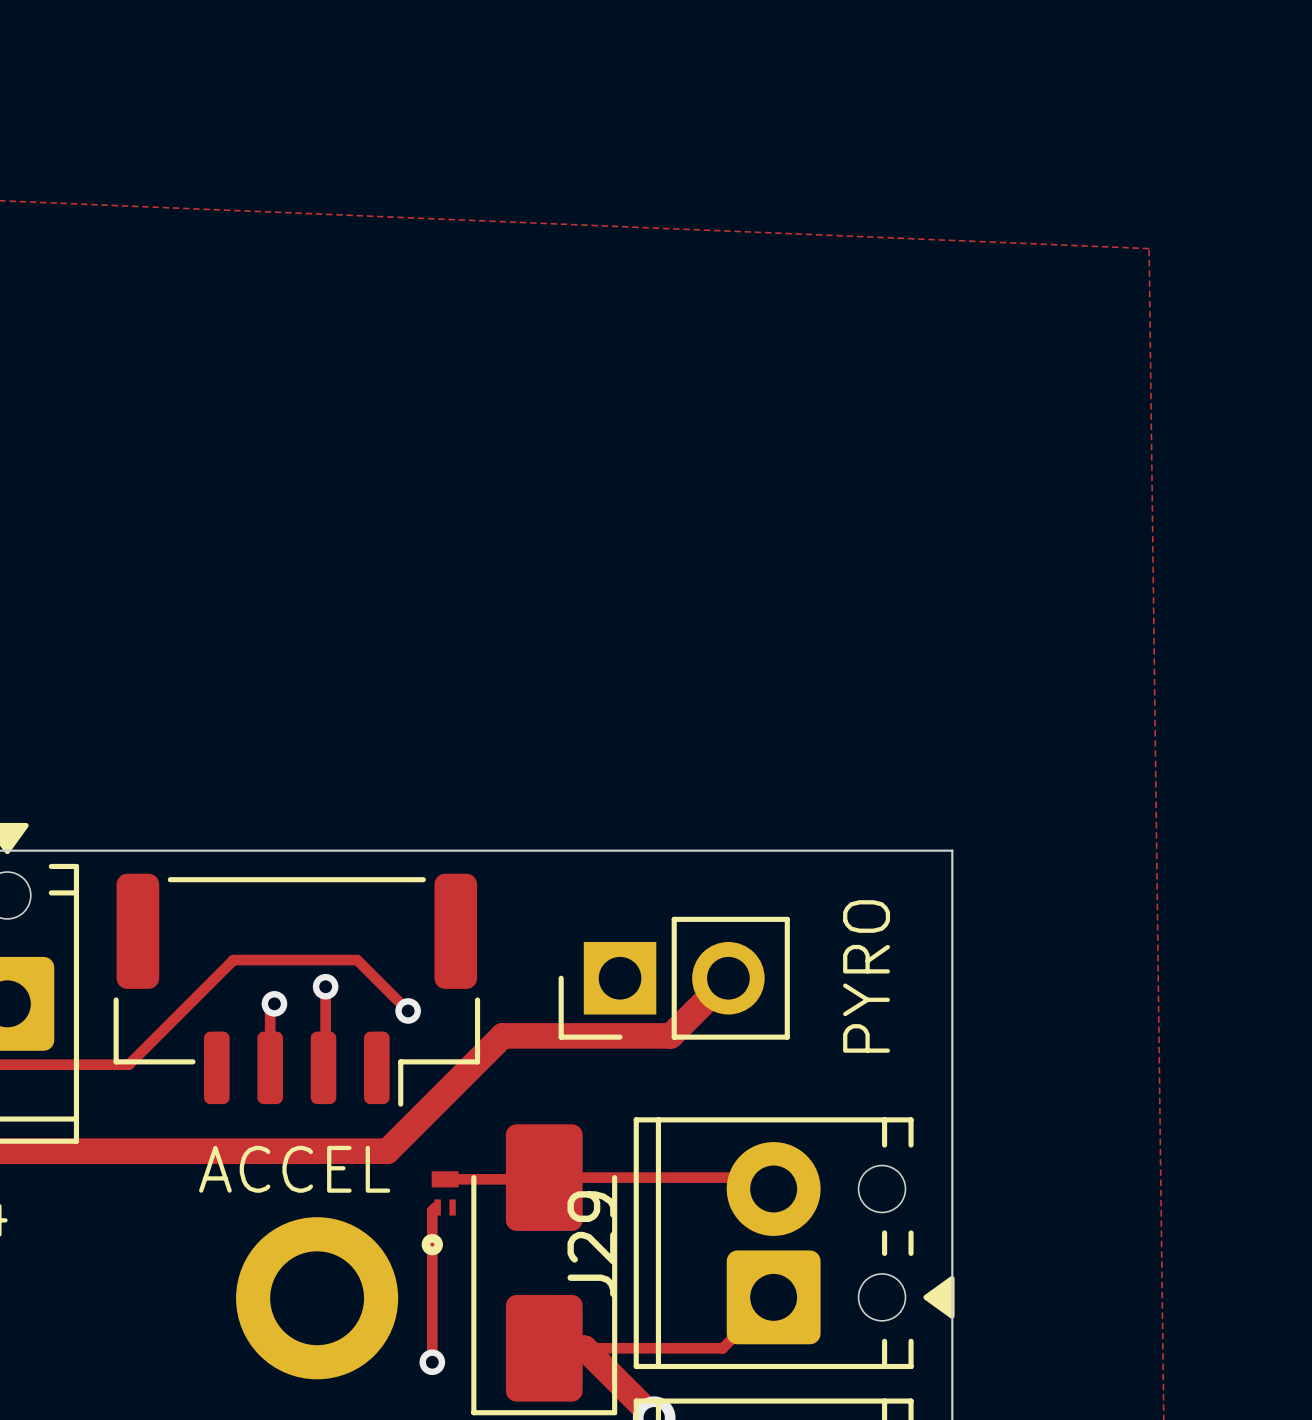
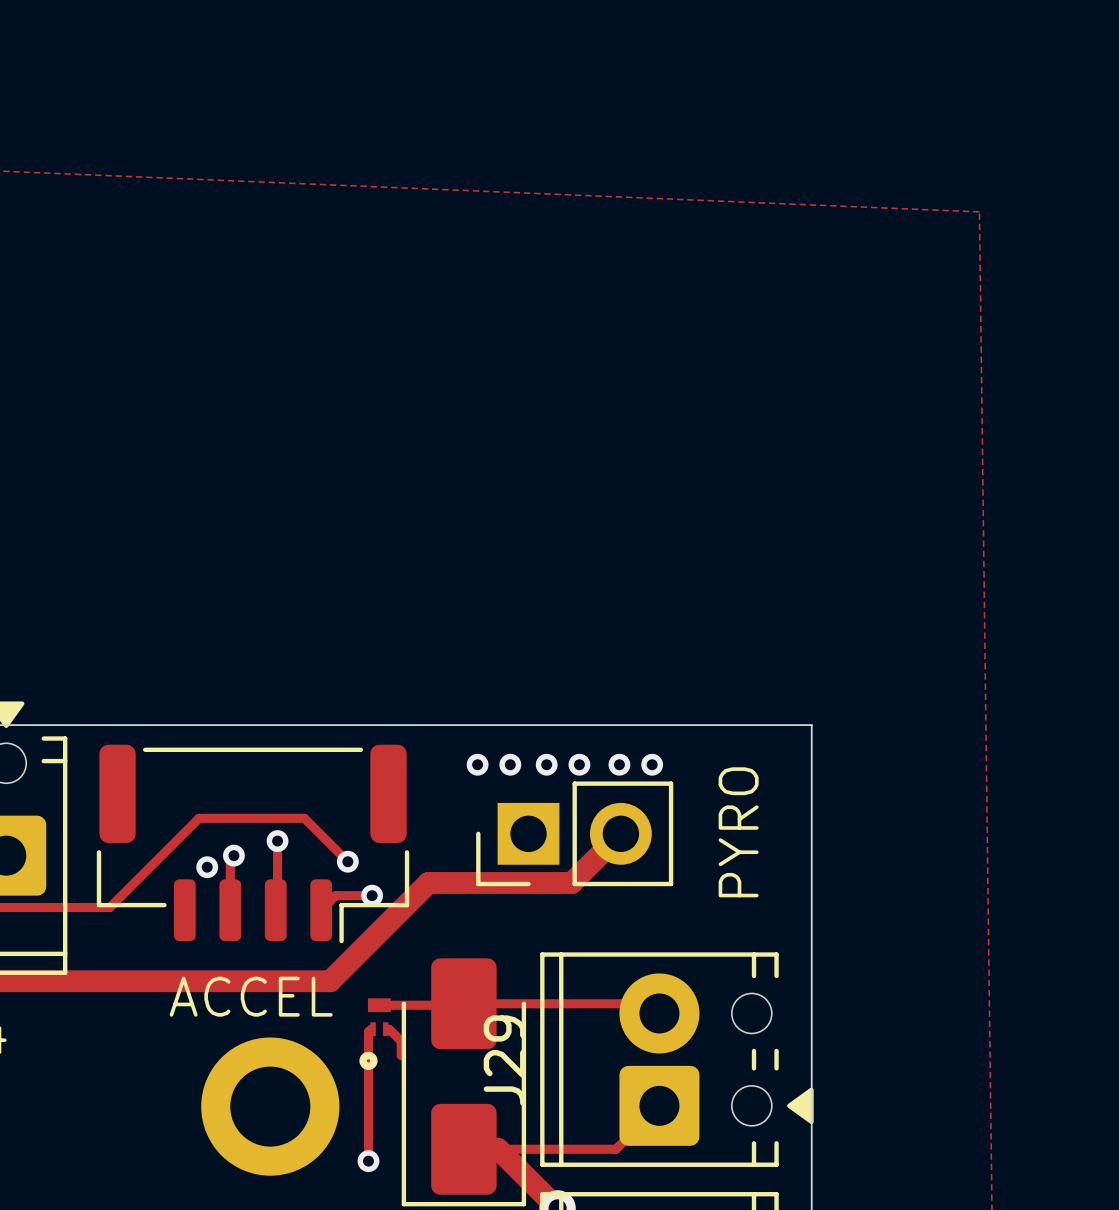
via: none -> (477, 764)
via: none -> (510, 764)
via: none -> (546, 764)
via: none -> (579, 764)
via: none -> (619, 764)
via: none -> (652, 764)
via: none -> (207, 867)
track: none -> (372, 895) (335, 895) (321, 910)
via: none -> (372, 895)
track: none -> (385, 1029) (389, 1029) (401, 1041) (401, 1055)

